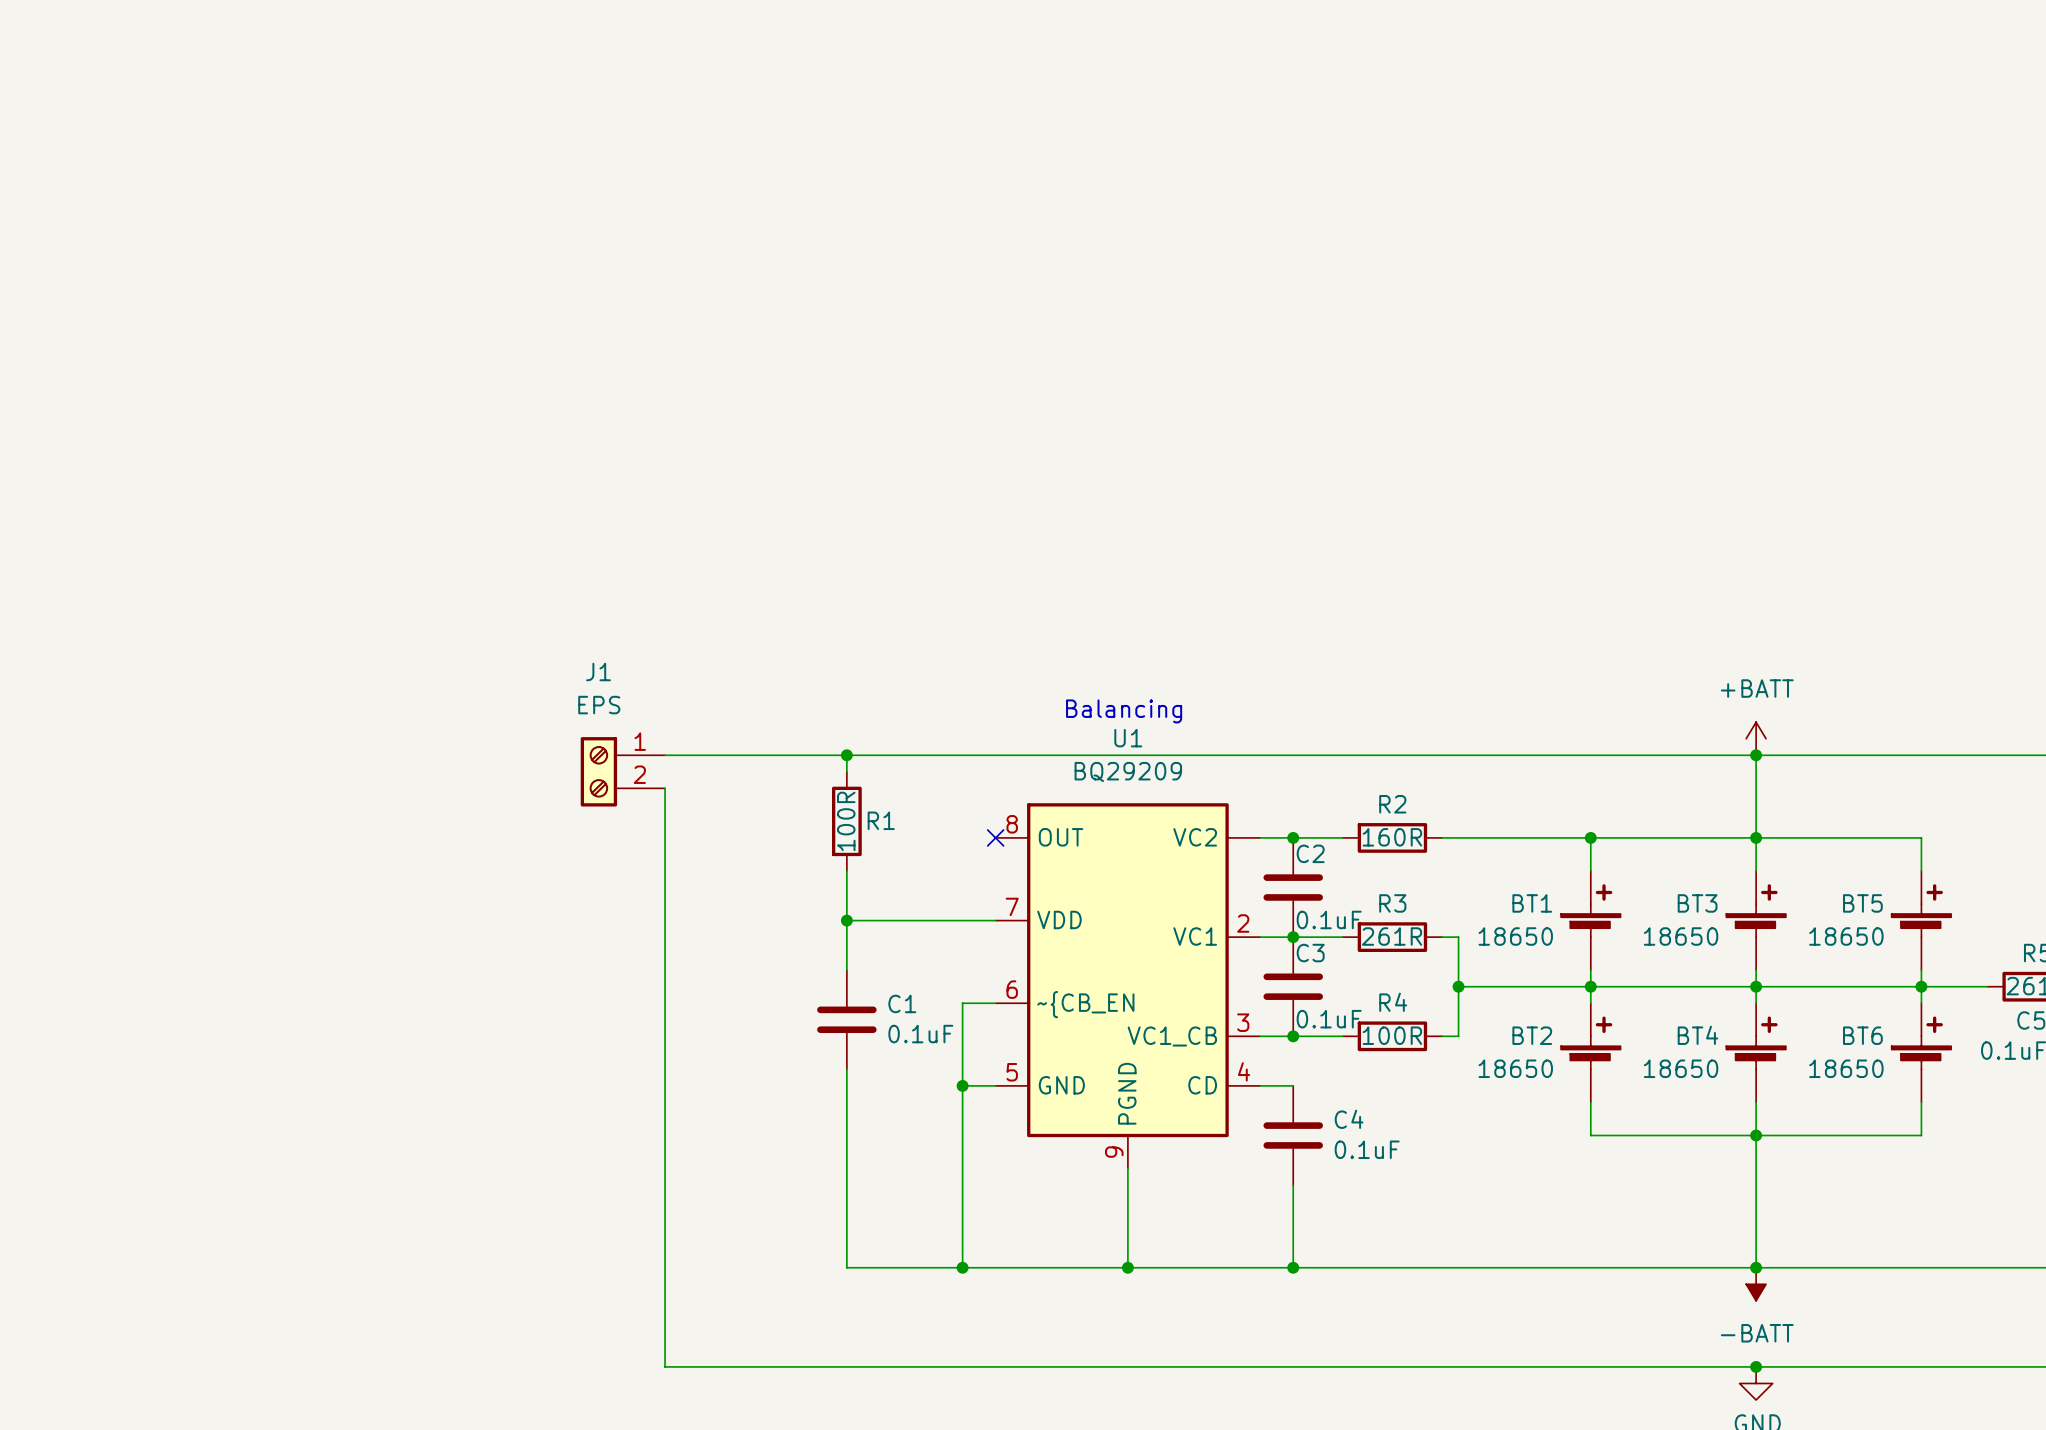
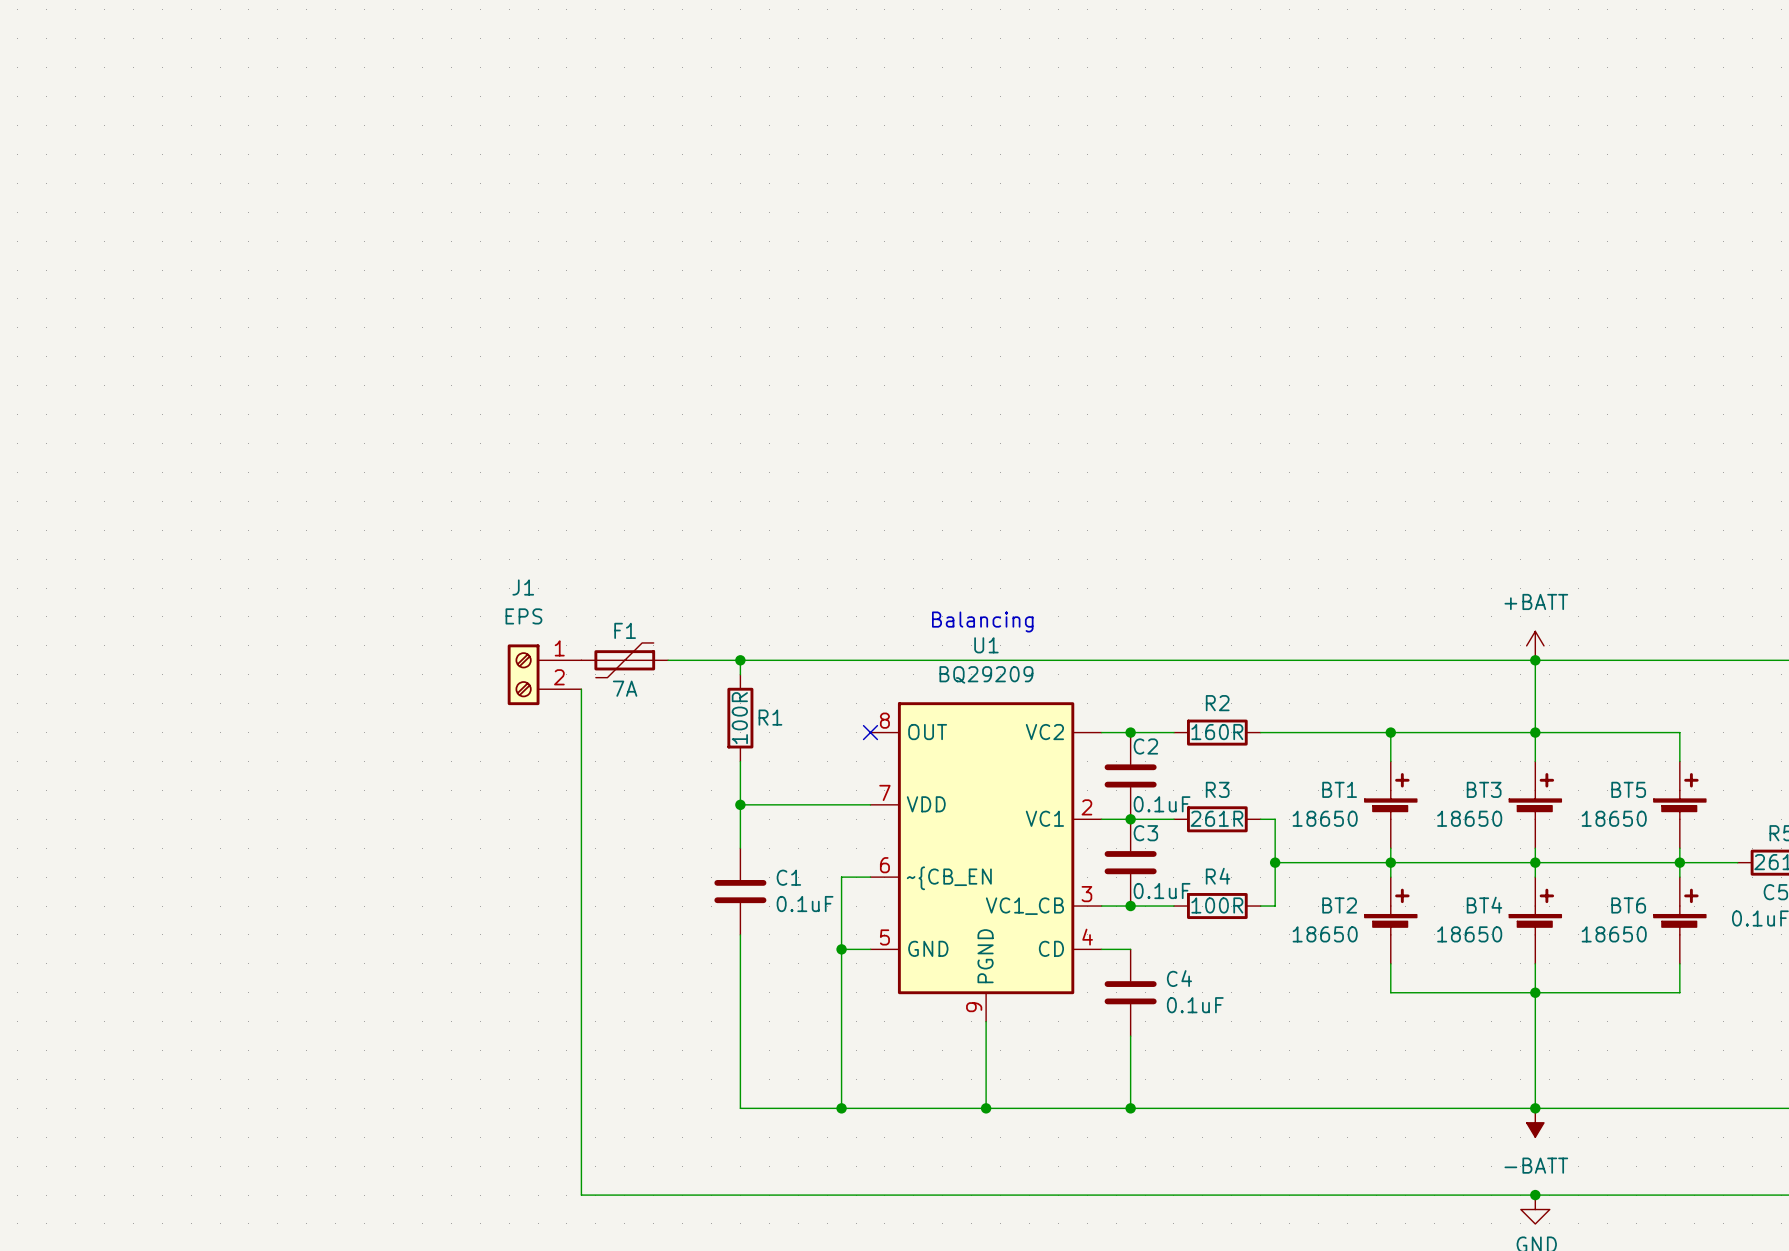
F1: none -> 7A (624, 660)

